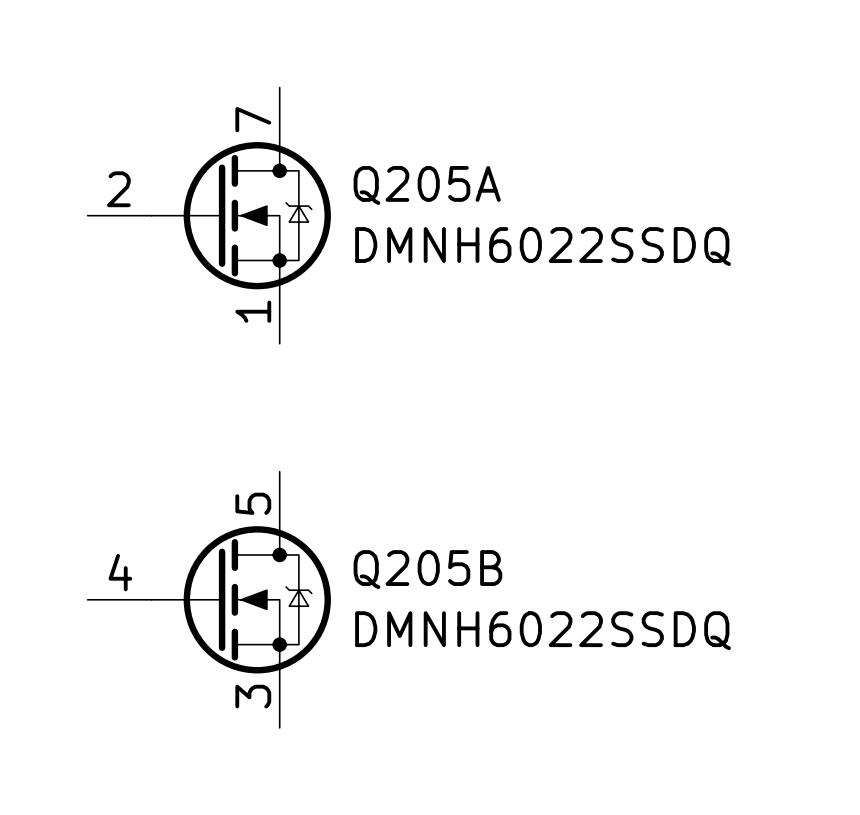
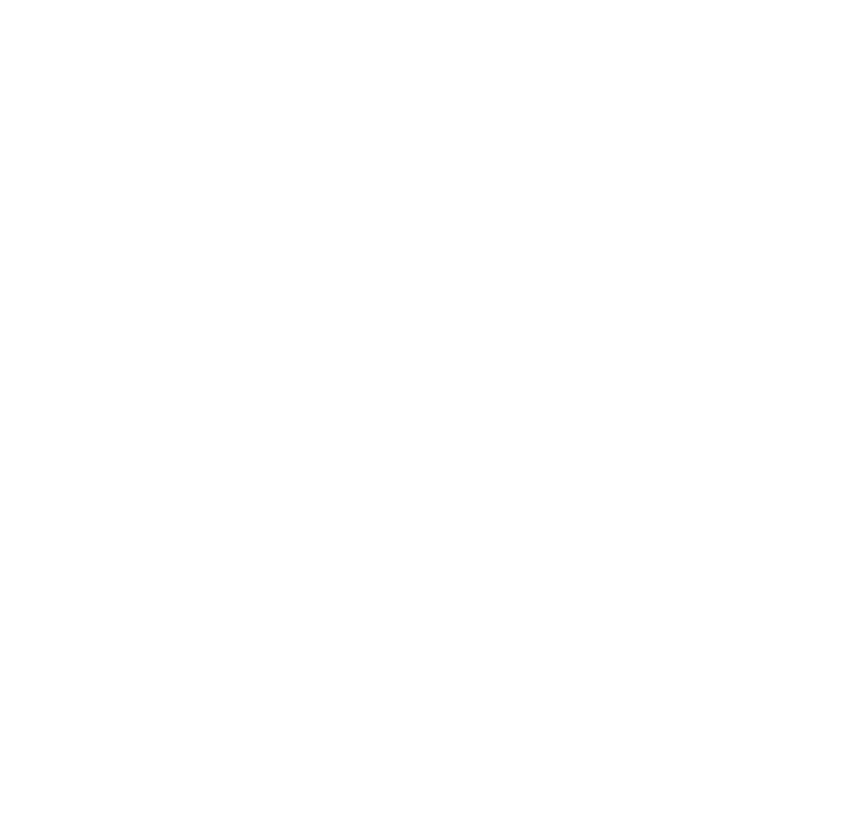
Q205A: DMNH6022SSDQ (209, 215) -> none
Q205B: DMNH6022SSDQ (209, 599) -> none

